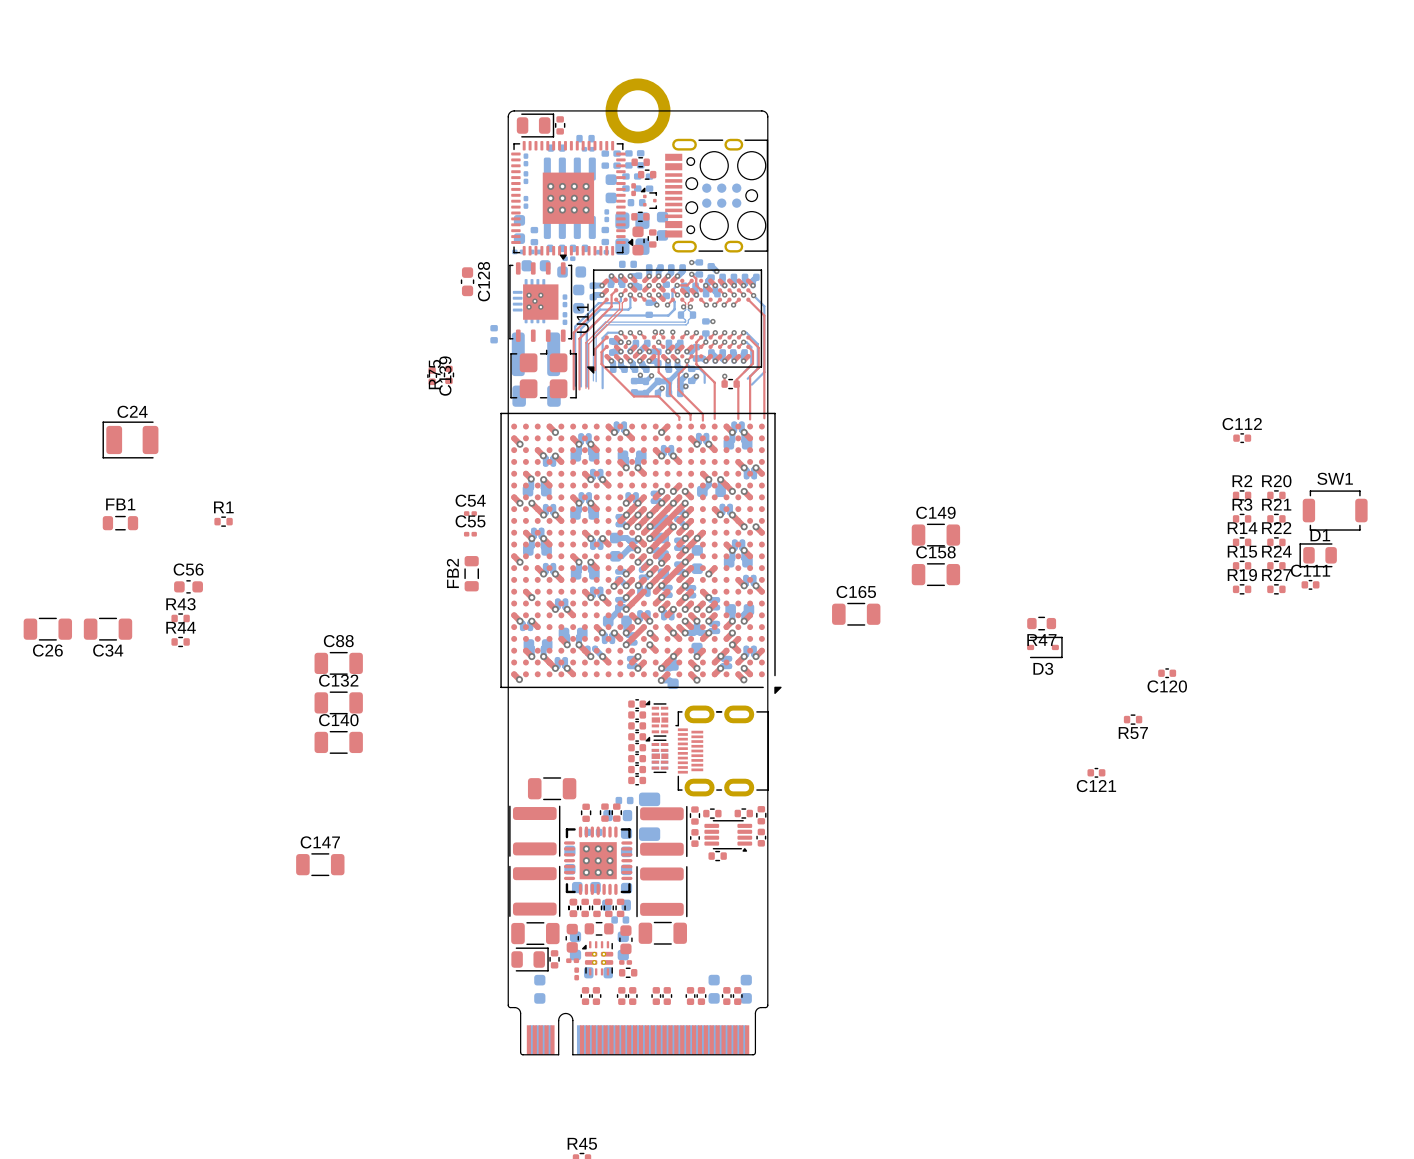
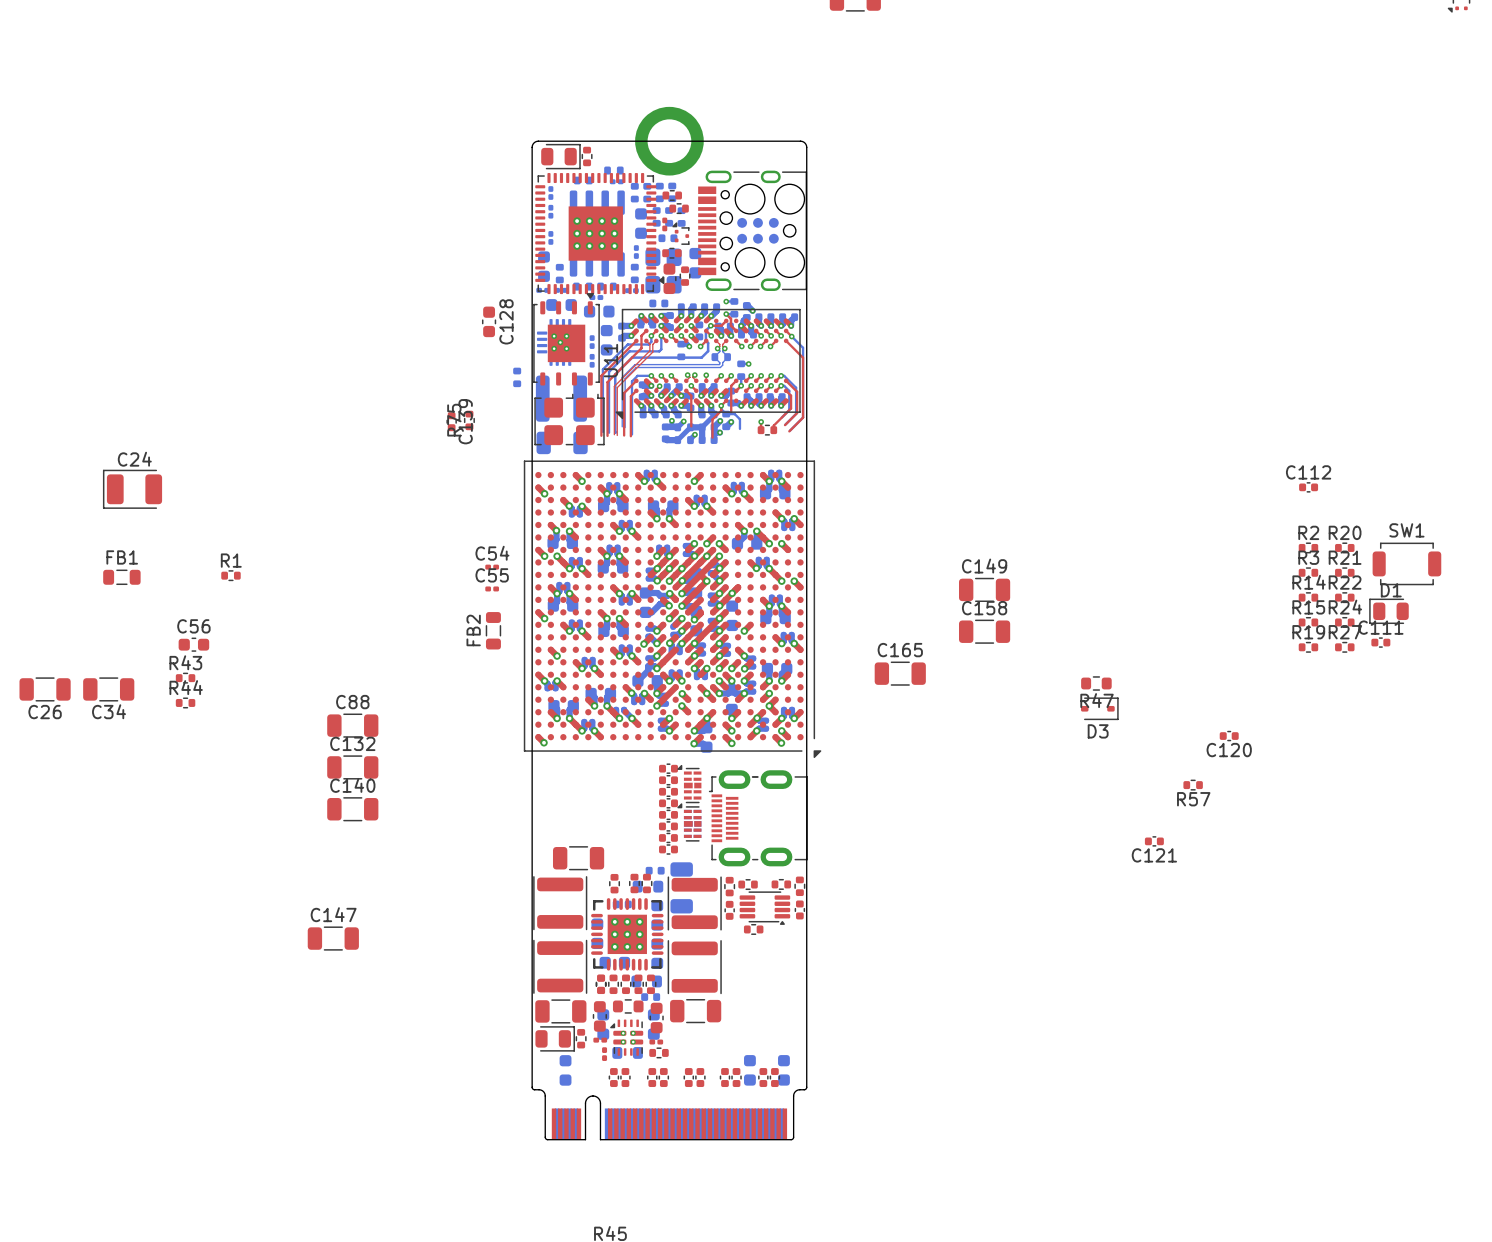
top track: (601, 364) (633, 396) (658, 396) (679, 417) (679, 420) -> (630, 409) (630, 436)
top track: (696, 364) (714, 382) (714, 418) -> (731, 409) (731, 412)
top track: none -> (624, 415) (624, 435)
top track: (658, 372) (669, 383) (669, 394) (690, 414) (690, 420) -> (691, 417) (691, 426)
top track: (764, 372) (764, 418) -> (803, 417) (789, 431)
top track: (750, 376) (750, 419) -> (788, 422) (785, 425)
top track: (736, 384) (738, 385) (738, 418) -> none
top track: (678, 389) (702, 414) (702, 420) -> (712, 436) (712, 437)

